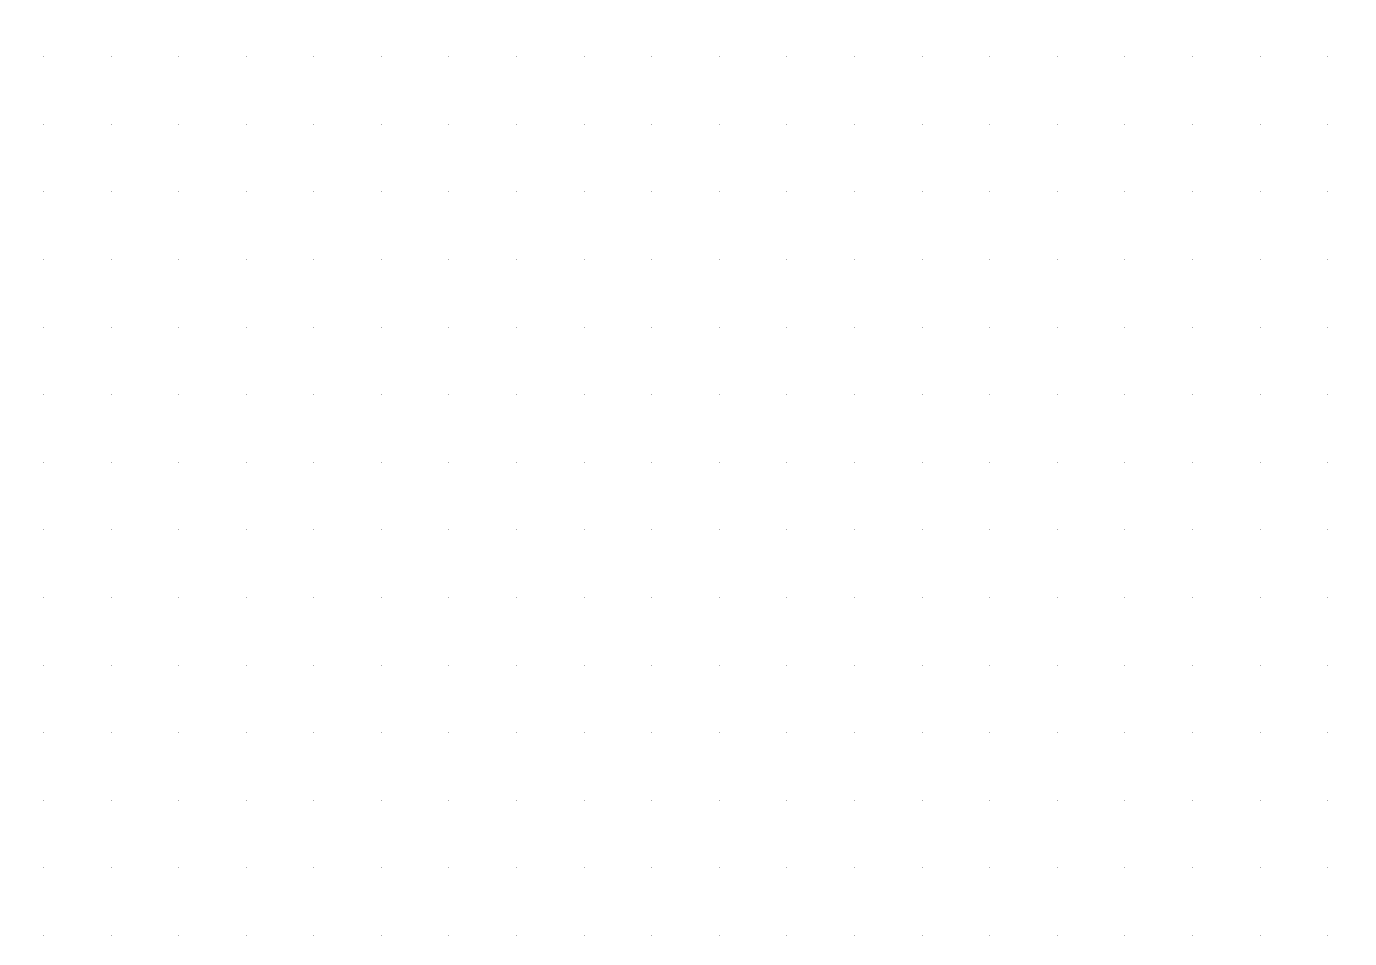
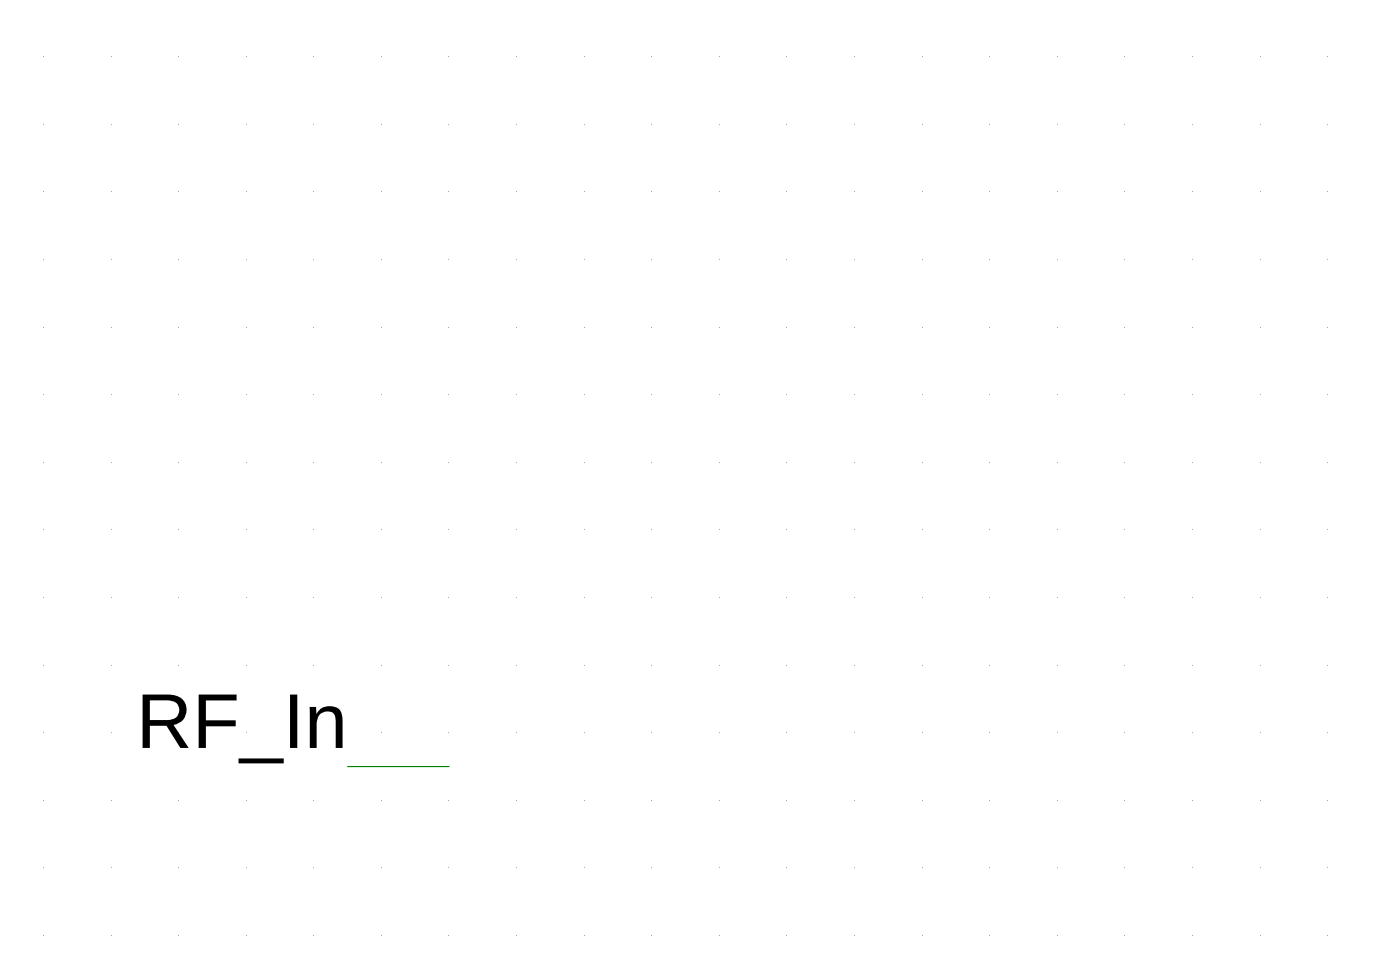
label: none -> RF_In (242, 728)
wire: none -> (347, 766) (448, 766)

